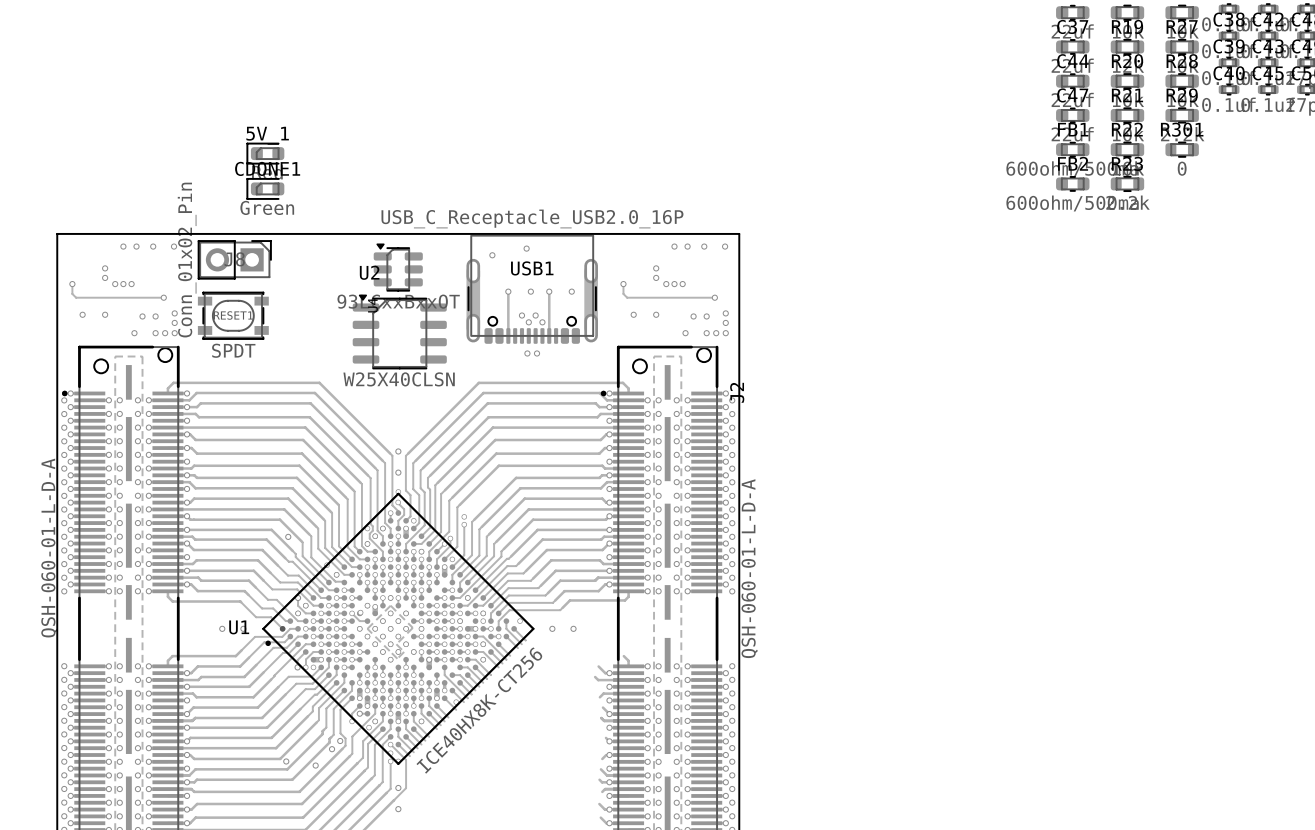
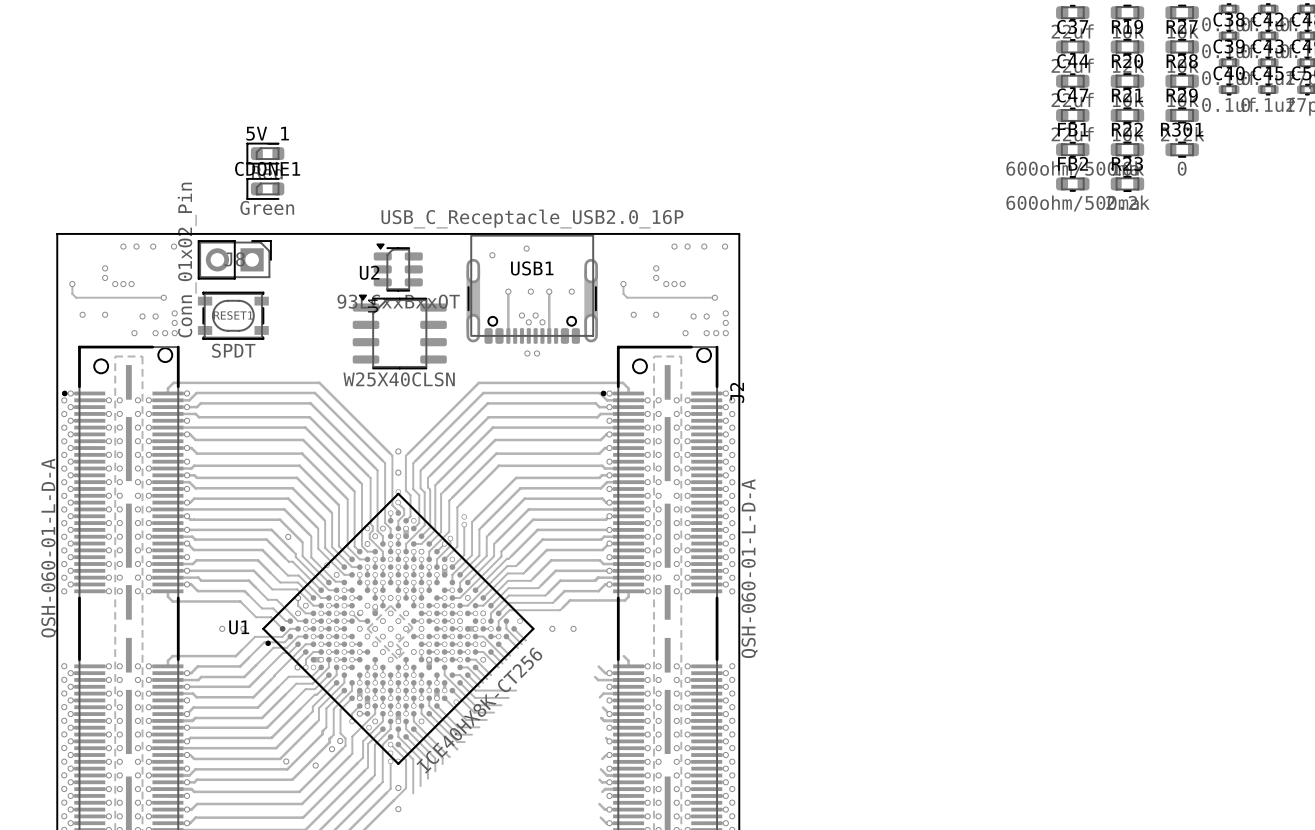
track: none -> (475, 690) (516, 690)
track: none -> (471, 694) (475, 697) (508, 697)
track: none -> (467, 698) (474, 705) (501, 705)
track: none -> (463, 702) (474, 712) (494, 712)
track: none -> (456, 709) (466, 719) (486, 719)
track: none -> (448, 717) (458, 727) (479, 727)
track: none -> (444, 721) (457, 734) (472, 734)
track: none -> (440, 725) (457, 742) (464, 742)
track: none -> (436, 729) (457, 749)
track: none -> (429, 736) (449, 756)
track: none -> (425, 740) (442, 757) (442, 764)
track: none -> (421, 744) (435, 758) (435, 771)
track: none -> (417, 748) (427, 758) (427, 778)
track: none -> (413, 752) (420, 759) (420, 786)
track: none -> (409, 756) (413, 759) (413, 793)

